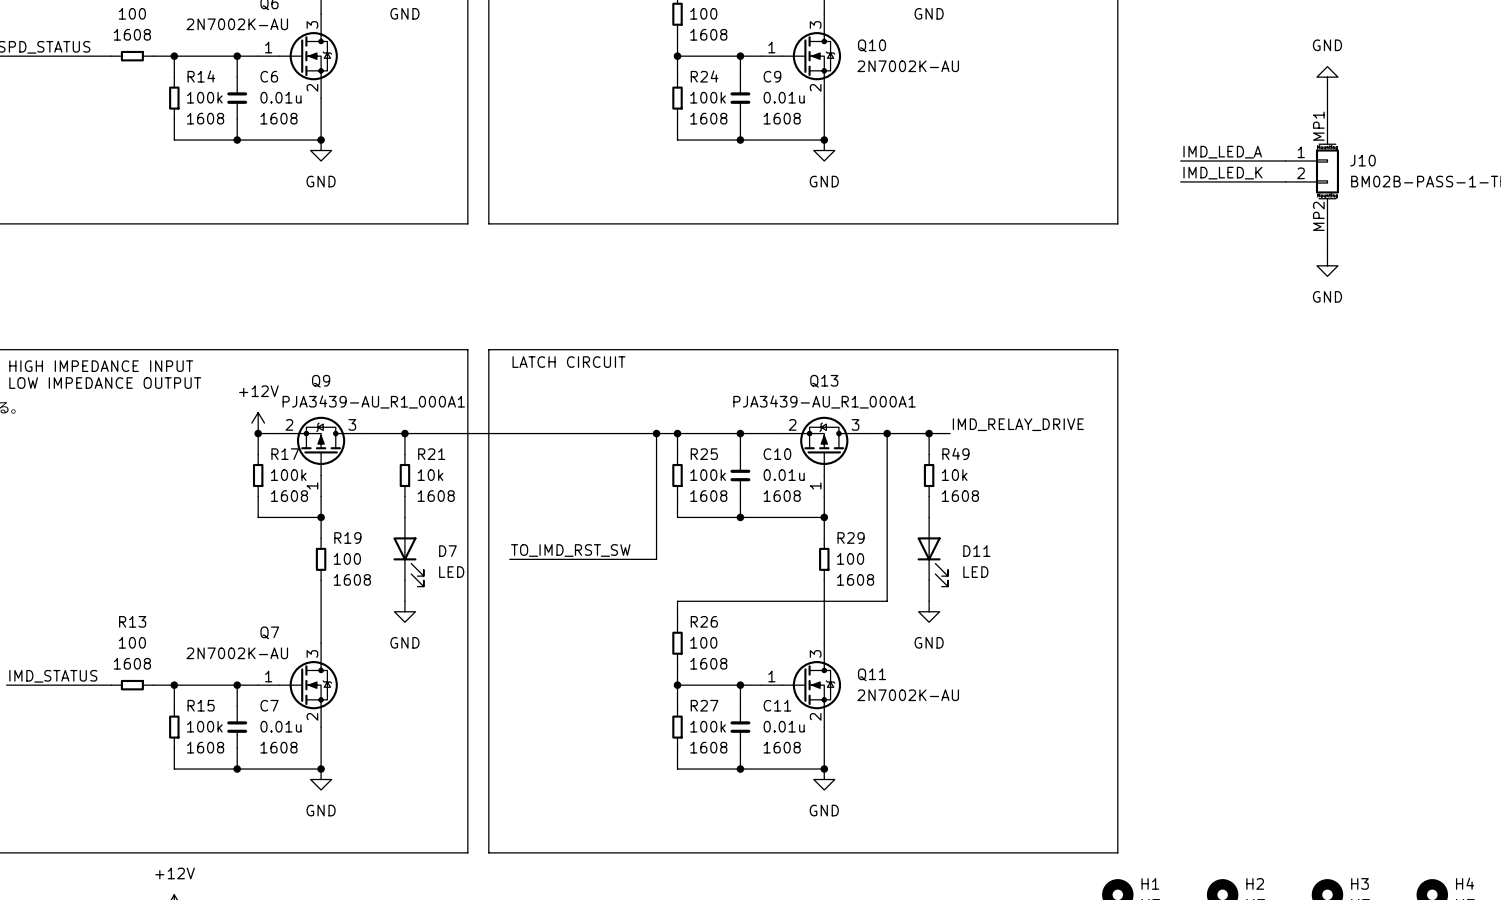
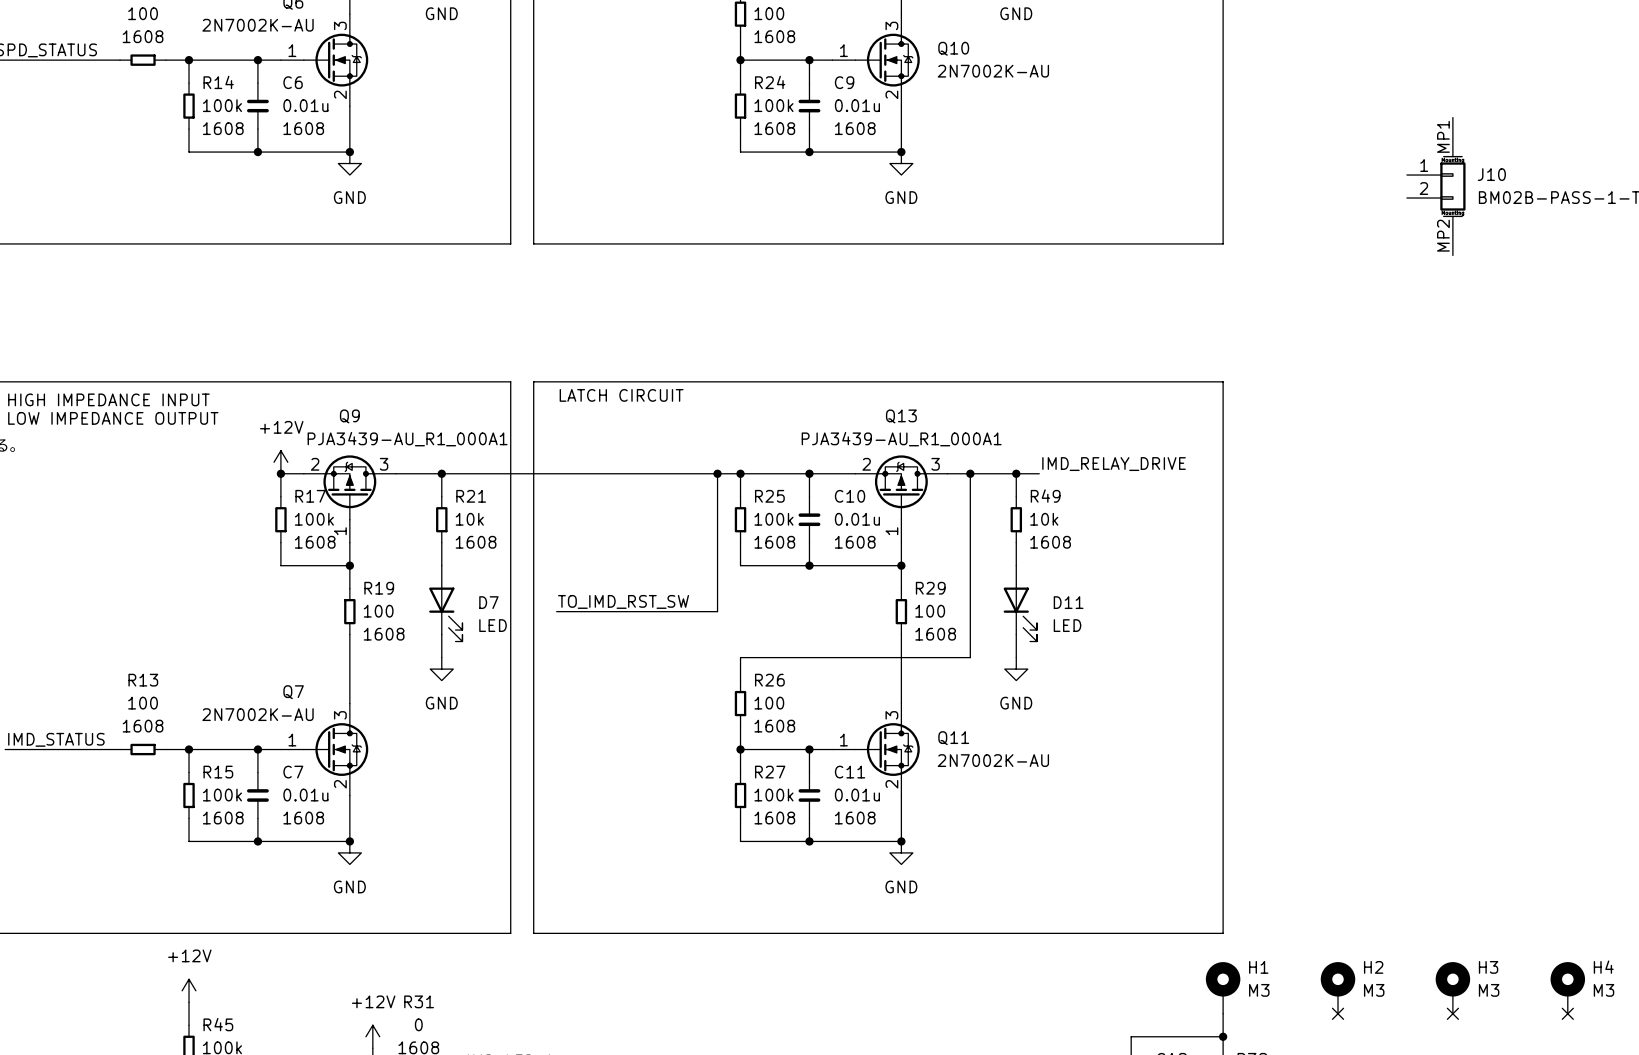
power symbol: GND (1327, 77) -> none
wire: (1327, 87) (1327, 108) -> none
label: IMD_LED_A (1222, 152) -> none
wire: (1180, 161) (1285, 161) -> none
label: IMD_LED_K (1222, 173) -> none
wire: (1180, 181) (1285, 181) -> none
wire: (1327, 234) (1327, 255) -> none
power symbol: GND (1327, 265) -> none

